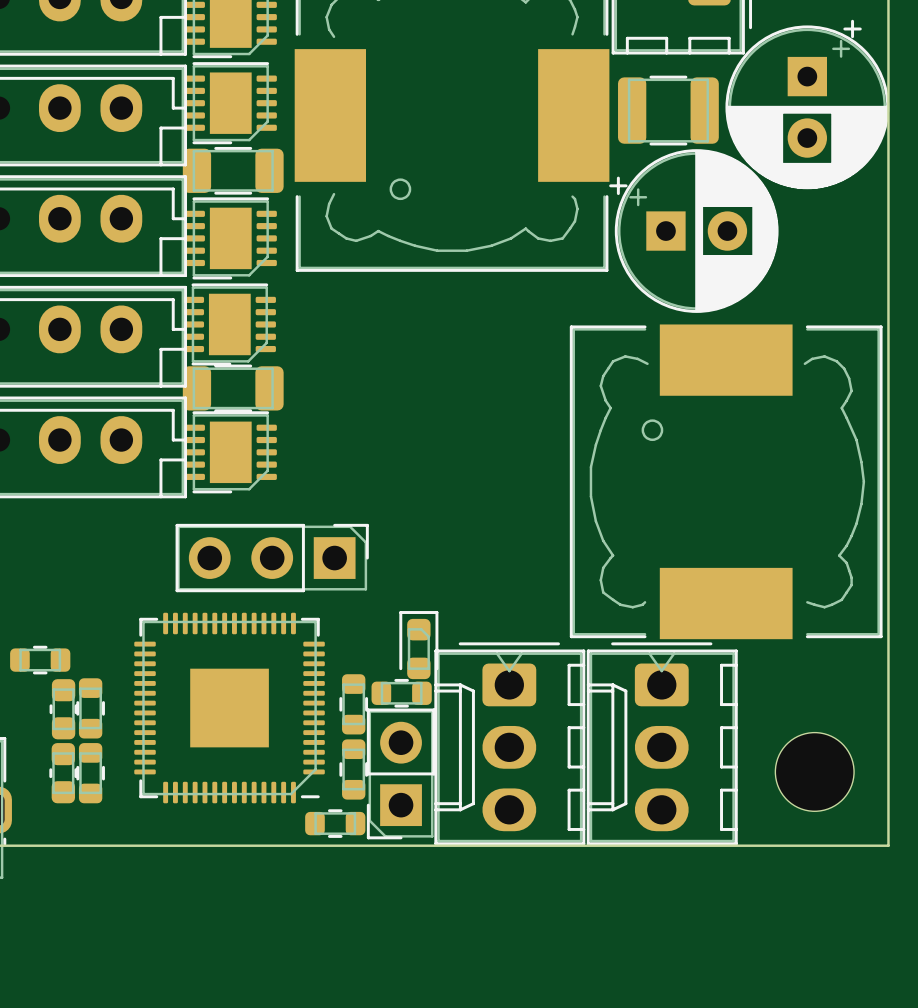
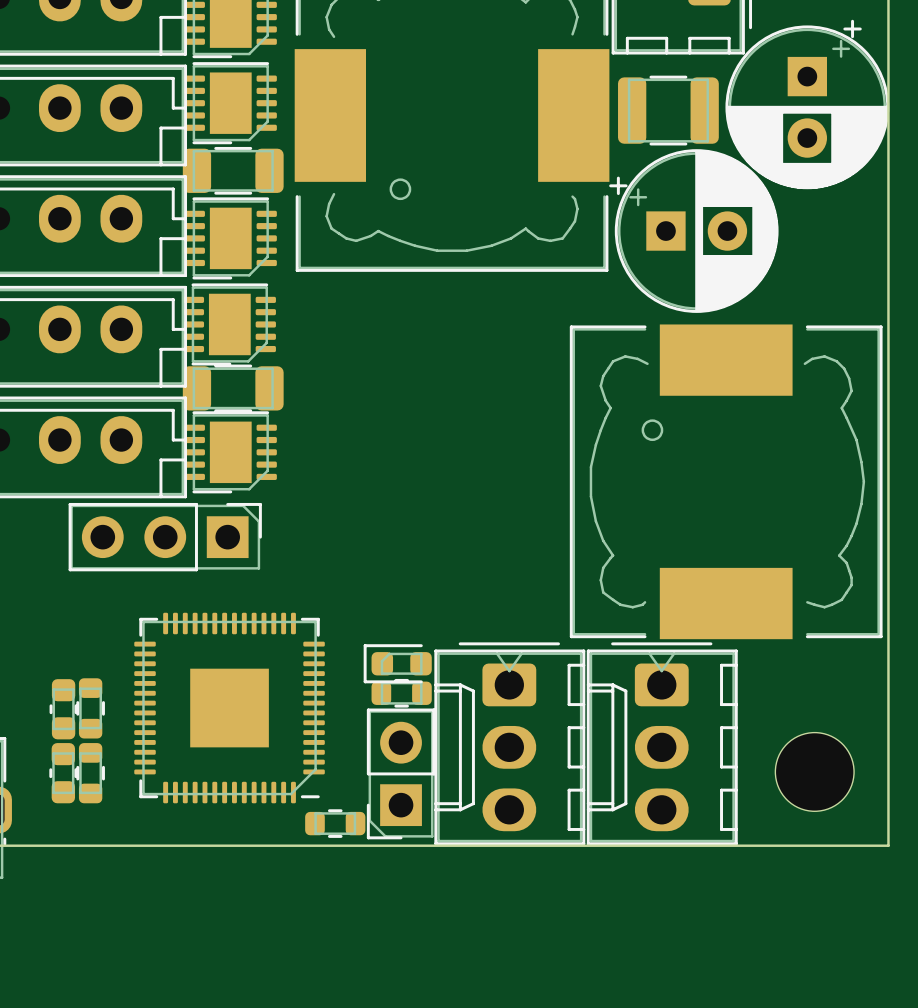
part position: (272, 558) -> (165, 537)
part rotation: 0° (418, 645) -> 90° counterclockwise (397, 663)
part: (40, 660) -> none
part: (353, 704) -> none
part: (353, 769) -> none

